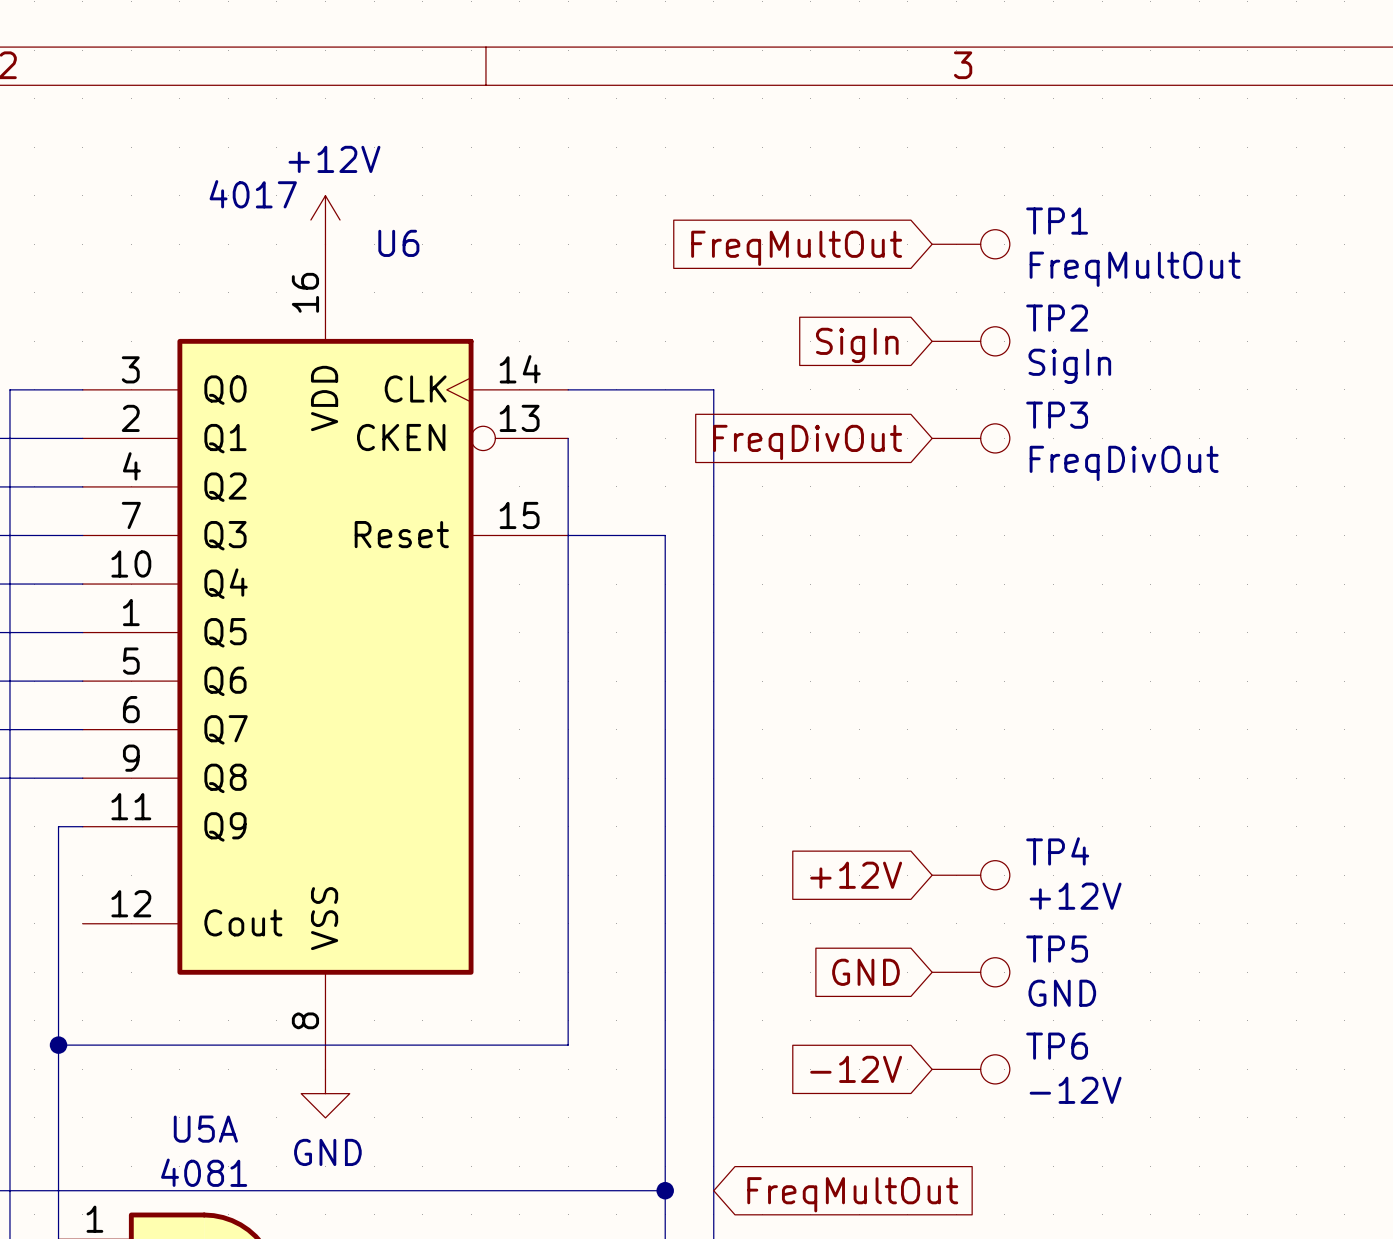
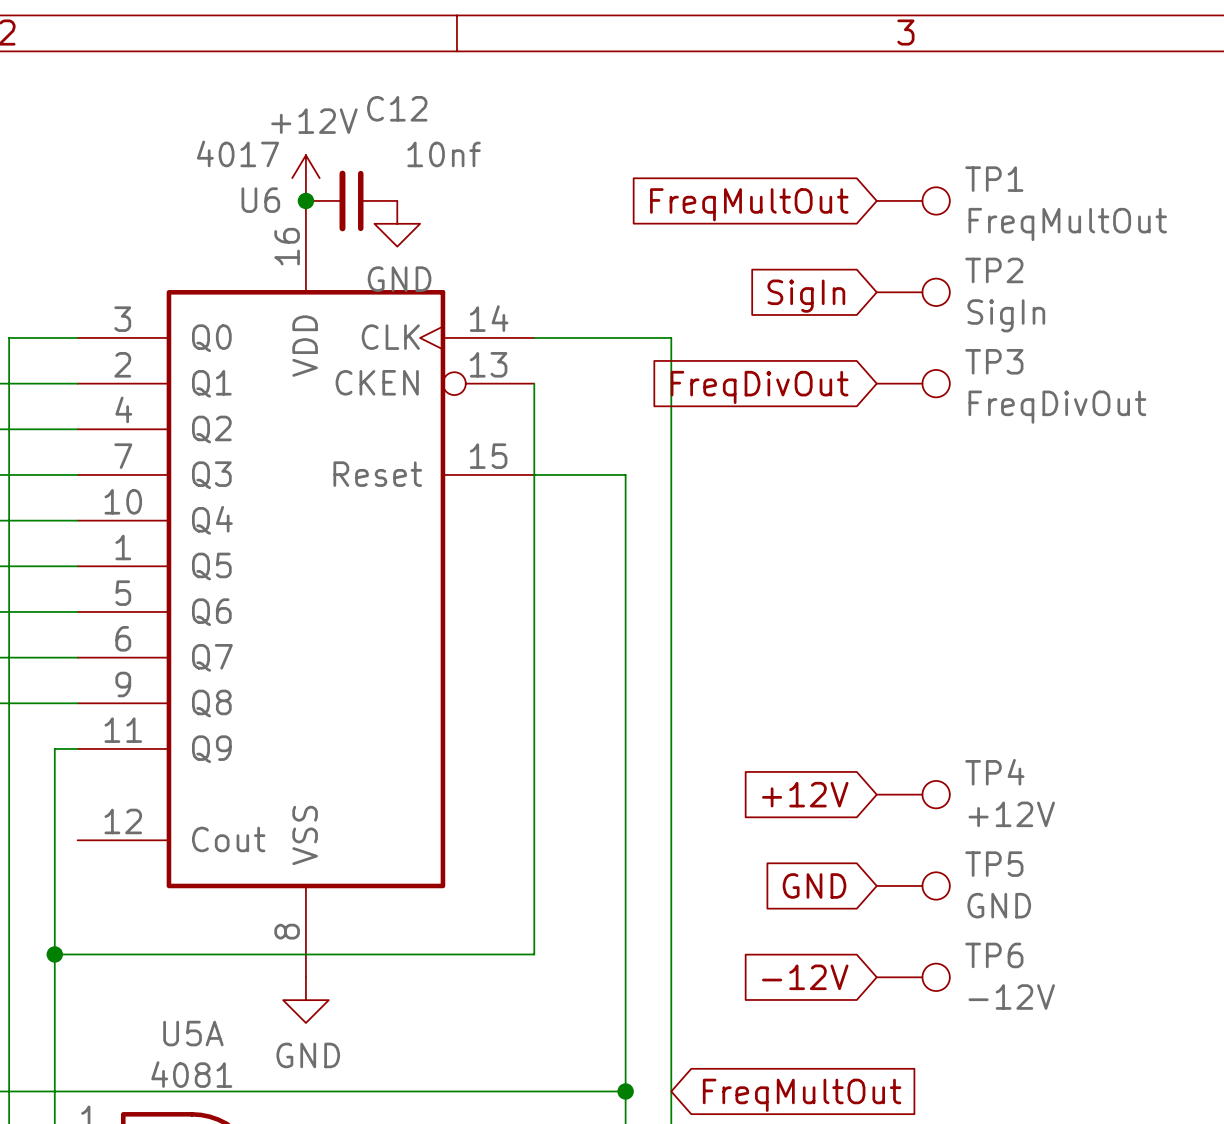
U6 name position: U6 (398, 243) -> U6 (260, 200)
junction: none -> (305, 200)
C12: none -> 10nf (351, 200)
power symbol: none -> GND (397, 223)

